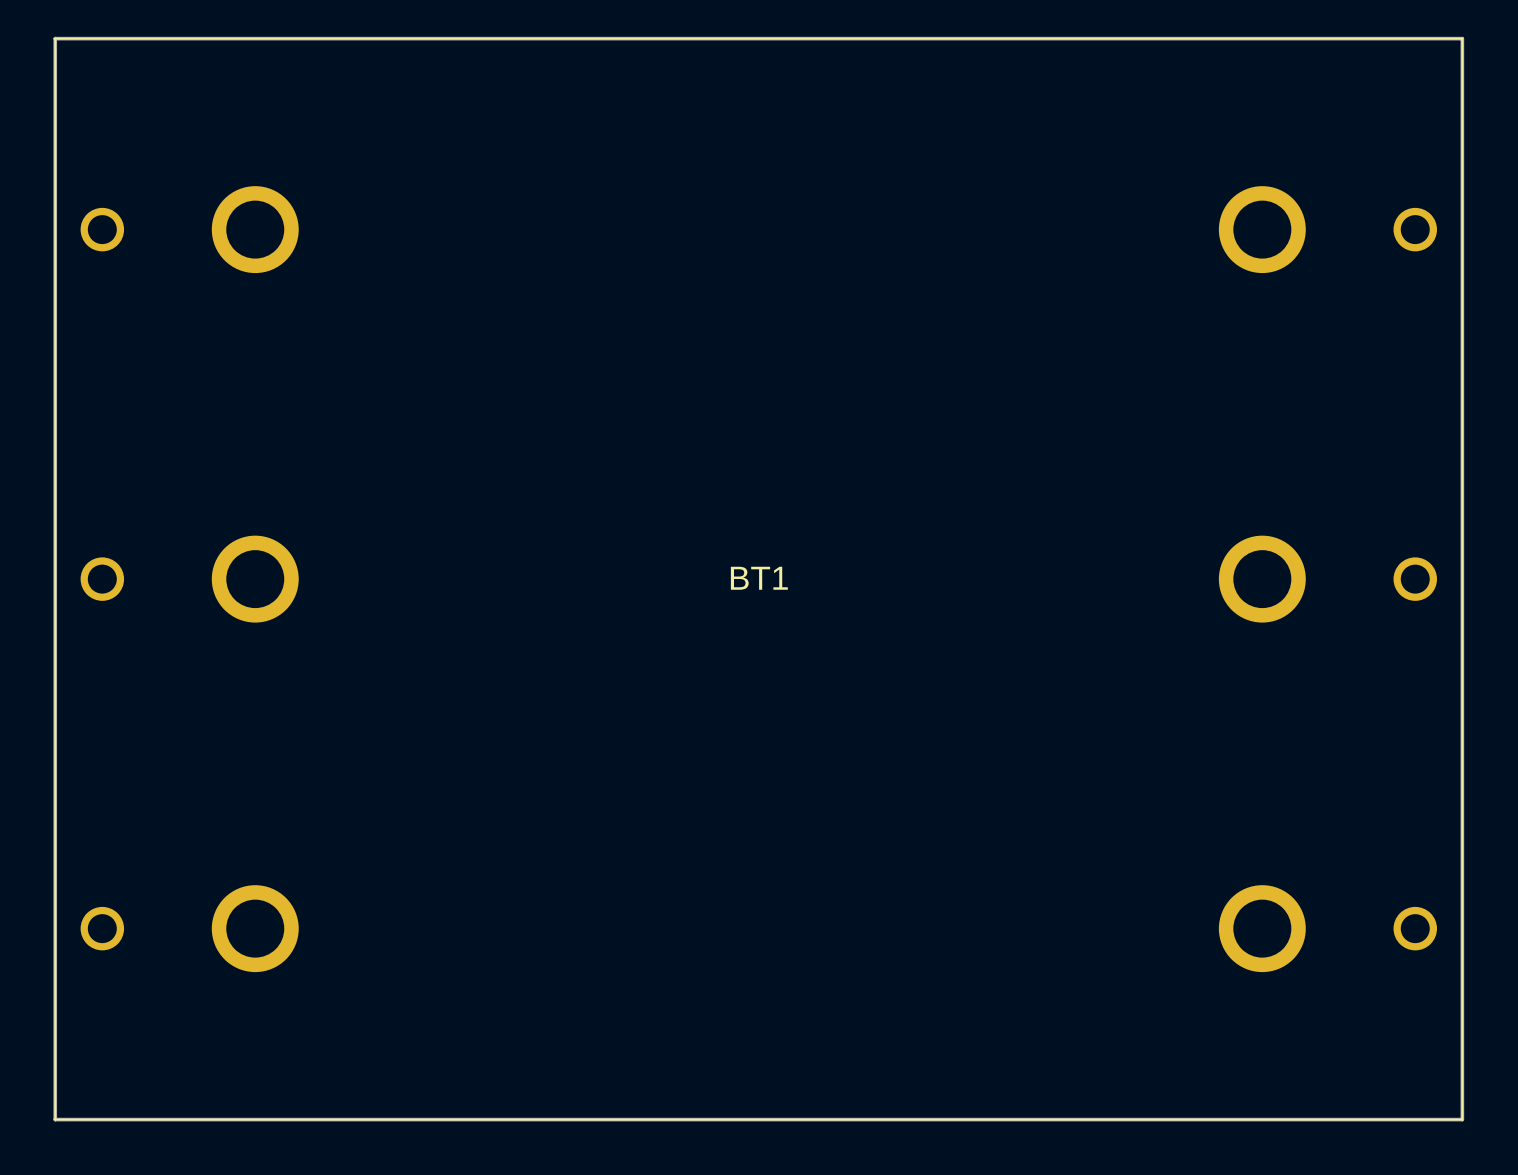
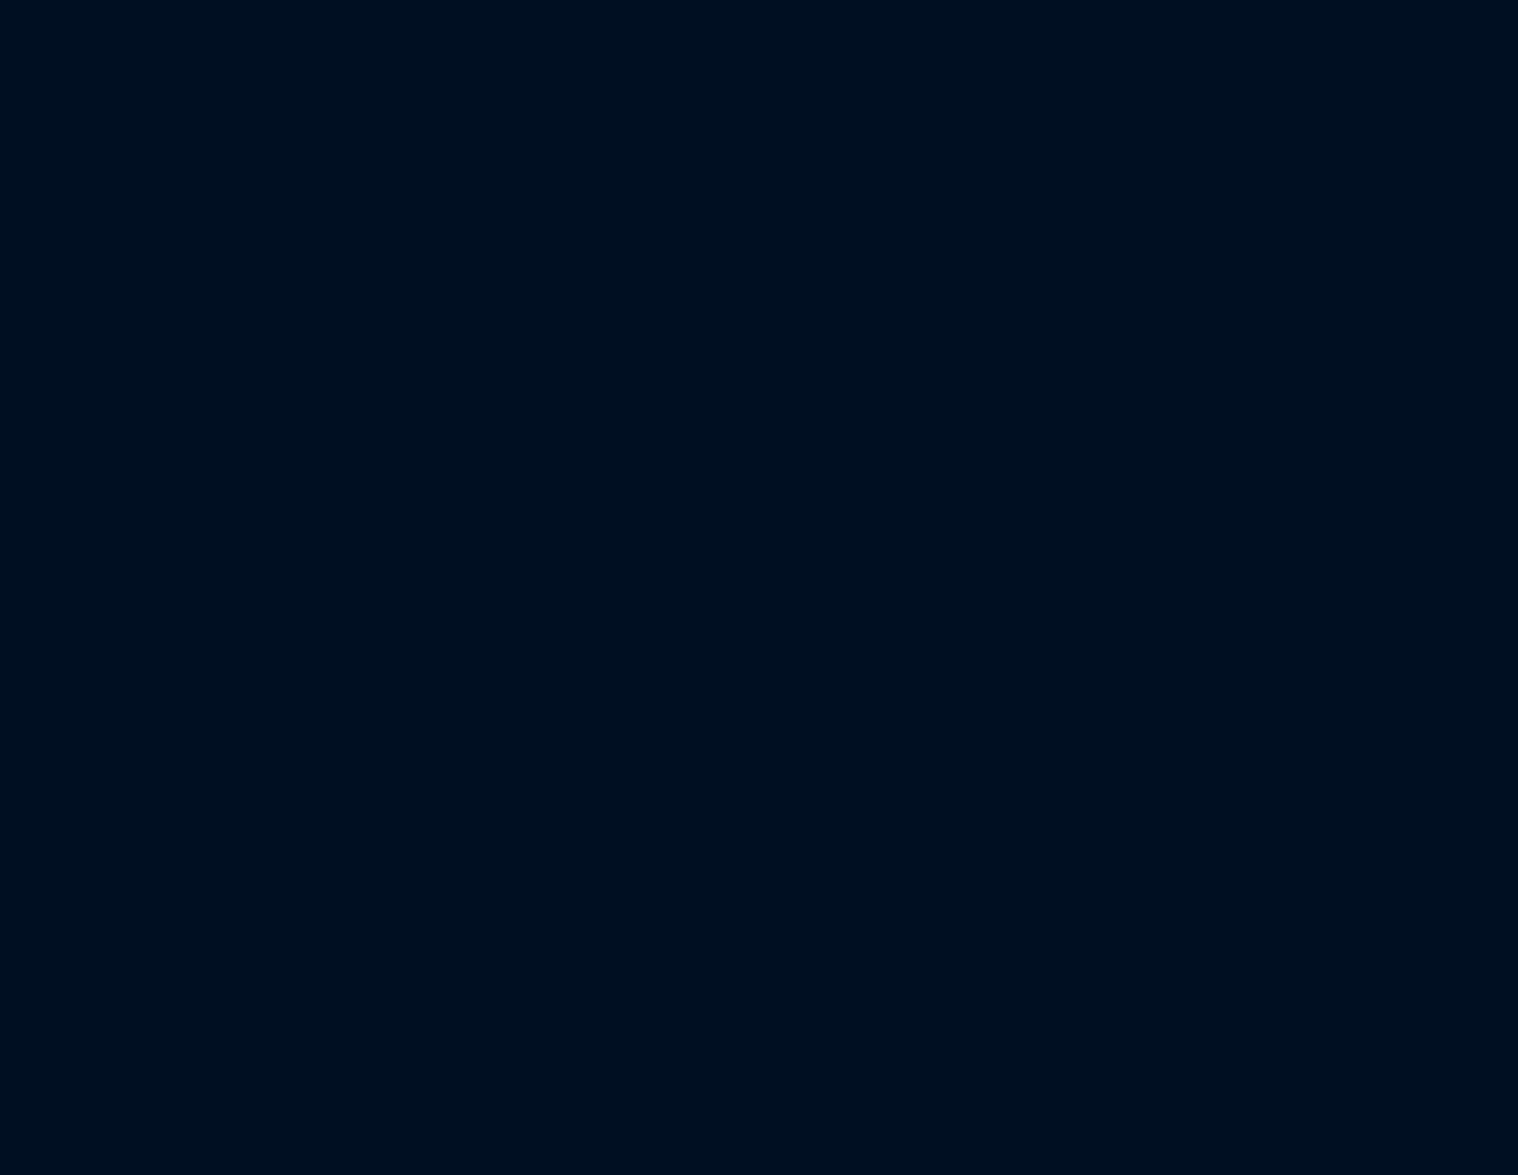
BT1: (758, 579) -> none

